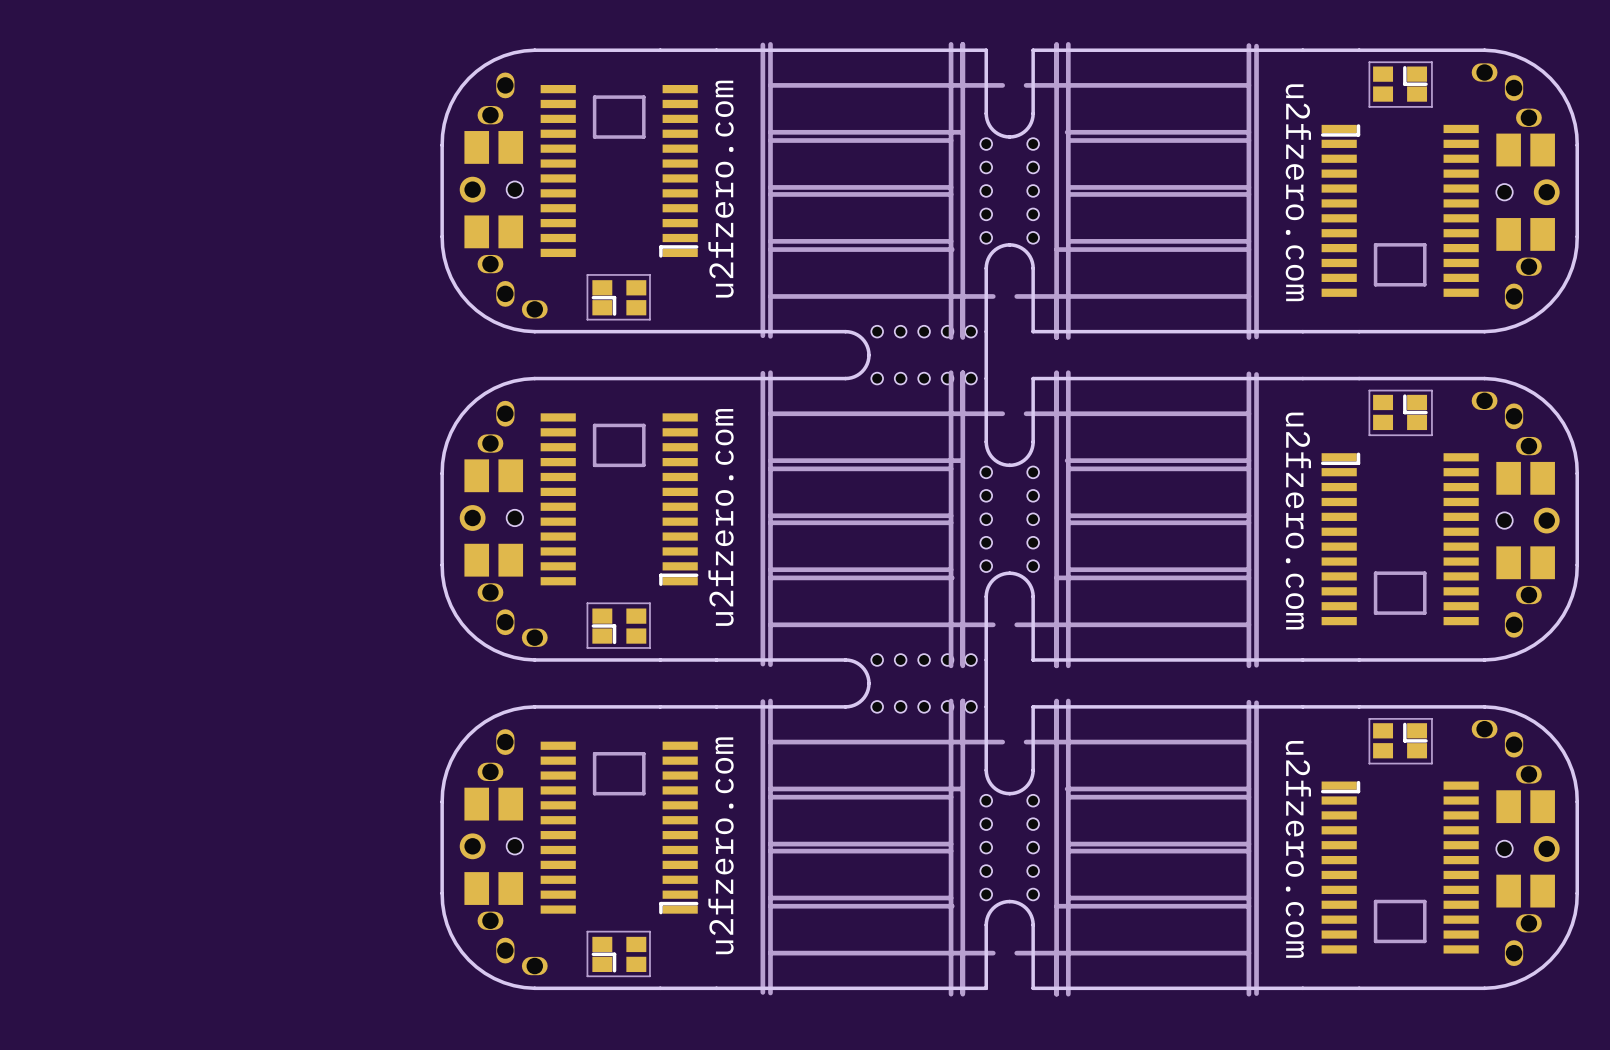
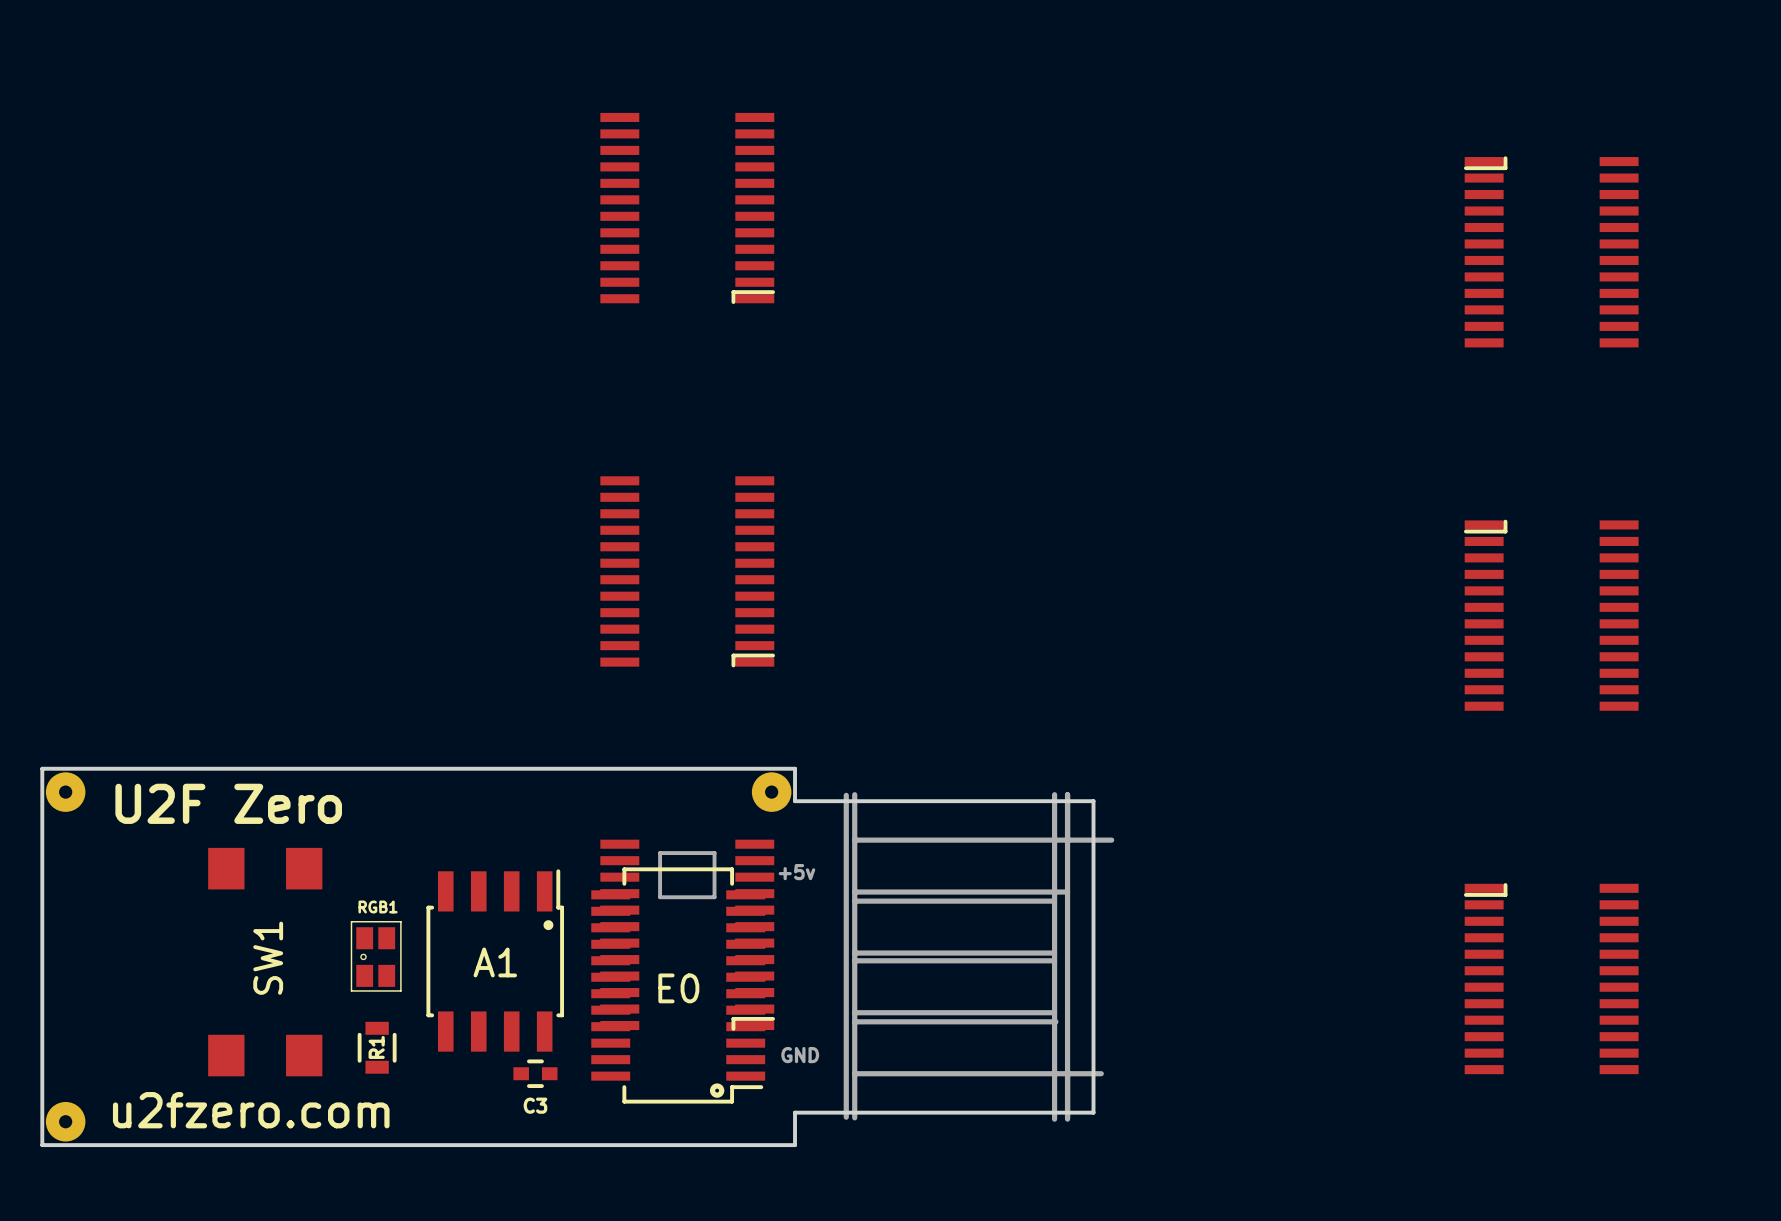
line: (762, 44) (762, 335) -> none
line: (770, 44) (770, 336) -> none
line: (951, 44) (951, 337) -> none
line: (962, 44) (962, 337) -> none
line: (1056, 44) (1056, 337) -> none
line: (1068, 44) (1068, 337) -> none
line: (1248, 45) (1248, 337) -> none
line: (1256, 46) (1256, 336) -> none
part: (1484, 72) -> none
part: (1400, 84) -> none
part: (505, 85) -> none
line: (770, 85) (1002, 85) -> none
line: (1026, 85) (1248, 85) -> none
part: (1514, 87) -> none
part: (490, 115) -> none
part: (619, 117) -> none
part: (1528, 117) -> none
line: (770, 132) (962, 132) -> none
line: (1067, 132) (1248, 132) -> none
line: (770, 140) (951, 140) -> none
line: (1068, 140) (1248, 140) -> none
line: (770, 187) (951, 187) -> none
line: (1068, 187) (1248, 187) -> none
part: (491, 189) -> none
text: u2fzero.com (721, 189) -> none
part: (986, 190) -> none
part: (1033, 190) -> none
text: u2fzero.com (1298, 192) -> none
part: (1527, 192) -> none
line: (770, 194) (951, 194) -> none
line: (1068, 194) (1248, 194) -> none
line: (770, 241) (951, 241) -> none
line: (1068, 241) (1248, 241) -> none
line: (770, 249) (952, 249) -> none
line: (1056, 249) (1248, 249) -> none
part: (490, 264) -> none
part: (1400, 264) -> none
part: (1528, 266) -> none
part: (505, 293) -> none
line: (770, 296) (993, 296) -> none
line: (1016, 296) (1248, 296) -> none
part: (1514, 296) -> none
part: (618, 297) -> none
part: (534, 309) -> none
part: (924, 331) -> none
line: (770, 372) (770, 664) -> none
line: (951, 372) (951, 665) -> none
line: (962, 372) (962, 665) -> none
line: (1056, 372) (1056, 665) -> none
line: (1068, 372) (1068, 665) -> none
line: (762, 373) (762, 664) -> none
line: (1248, 373) (1248, 665) -> none
line: (1256, 374) (1256, 665) -> none
part: (924, 378) -> none
part: (1484, 400) -> none
part: (1400, 412) -> none
part: (505, 413) -> none
line: (770, 413) (1002, 413) -> none
line: (1026, 413) (1248, 413) -> none
part: (1514, 416) -> none
part: (490, 443) -> none
part: (619, 445) -> none
part: (1528, 446) -> none
line: (770, 460) (962, 460) -> none
line: (1067, 460) (1248, 460) -> none
line: (770, 468) (951, 468) -> none
line: (1068, 468) (1248, 468) -> none
line: (770, 515) (951, 515) -> none
line: (1068, 515) (1248, 515) -> none
part: (491, 517) -> none
text: u2fzero.com (721, 517) -> none
part: (986, 519) -> none
part: (1033, 519) -> none
part: (1527, 520) -> none
text: u2fzero.com (1298, 521) -> none
line: (770, 522) (951, 522) -> none
line: (1068, 522) (1248, 522) -> none
line: (770, 569) (951, 569) -> none
line: (1068, 569) (1248, 569) -> none
line: (770, 577) (952, 577) -> none
line: (1056, 577) (1248, 577) -> none
part: (490, 592) -> none
part: (1400, 593) -> none
part: (1528, 595) -> none
part: (505, 622) -> none
line: (770, 624) (993, 624) -> none
line: (1016, 624) (1248, 624) -> none
part: (1514, 624) -> none
part: (618, 625) -> none
part: (534, 637) -> none
part: (924, 659) -> none
part: none -> (65, 792)
part: none -> (771, 792)
line: (1056, 701) (1056, 994) -> none
line: (1068, 701) (1068, 994) -> none
line: (1248, 702) (1248, 994) -> none
line: (1256, 702) (1256, 993) -> none
board edge: (716, 706) (534, 706) (503, 712) (476, 728) (455, 751) (444, 780) (442, 801) (442, 893) (444, 914) (455, 943) (468, 960) (485, 973) (513, 985) (534, 988) (716, 988) -> (795, 801) (795, 768) (42, 768) (42, 1145) (795, 1145) (795, 1112)
board edge: (845, 706) (859, 702) (865, 695) (868, 686) (868, 677) (864, 669) (851, 660) (524, 659) (503, 654) (485, 644) (468, 631) (455, 615) (447, 596) (442, 575) (442, 463) (447, 442) (455, 423) (468, 406) (485, 393) (513, 381) (534, 378) (848, 378) (862, 371) (867, 364) (868, 355) (867, 346) (862, 338) (848, 331) (534, 331) (513, 329) (485, 316) (468, 303) (455, 286) (447, 267) (442, 236) (442, 145) (444, 124) (455, 95) (476, 71) (503, 55) (534, 50) (986, 50) (987, 119) (995, 132) (1009, 136) (1023, 132) (1032, 119) (1033, 50) (1484, 50) (1515, 55) (1542, 71) (1563, 95) (1575, 124) (1577, 145) (1577, 236) (1575, 257) (1563, 286) (1550, 303) (1534, 316) (1515, 326) (1484, 331) (1033, 331) (1033, 268) (1031, 259) (1021, 248) (1012, 245) (1003, 245) (993, 251) (986, 265) (986, 441) (991, 456) (1003, 464) (1015, 464) (1028, 456) (1033, 441) (1033, 378) (1484, 378) (1515, 384) (1534, 393) (1557, 414) (1568, 432) (1576, 463) (1576, 575) (1568, 605) (1550, 631) (1534, 644) (1515, 654) (1484, 659) (1033, 659) (1032, 590) (1023, 578) (1015, 574) (1006, 573) (993, 580) (986, 593) (986, 706) -> (937, 801) (1093, 801)
part: (924, 706) -> none
text: none -> U2F Zero (228, 803)
part: (1484, 729) -> none
part: (1400, 741) -> none
part: (505, 742) -> none
line: (1026, 742) (1248, 742) -> none
part: (1514, 744) -> none
board edge: (986, 770) (991, 784) (1003, 792) (1015, 792) (1028, 784) (1033, 770) (1033, 706) (1484, 706) (1515, 712) (1534, 721) (1550, 735) (1568, 761) (1575, 780) (1577, 801) (1577, 893) (1572, 924) (1563, 943) (1550, 960) (1534, 973) (1505, 985) (1484, 988) (1033, 988) (1033, 924) (1028, 910) (1015, 902) (1003, 902) (991, 910) (986, 924) -> (1093, 871) (1093, 1042)
part: (490, 771) -> none
text: none -> +5v (796, 872)
part: (1528, 774) -> none
line: (1067, 788) (1248, 788) -> none
line: (1068, 797) (1248, 797) -> none
drawing: none -> [543, 920, 554, 931]
drawing: none -> [360, 953, 367, 961]
line: (1068, 844) (1248, 844) -> none
text: u2fzero.com (721, 845) -> none
part: (491, 846) -> none
RGB1: none -> (376, 956)
part: (986, 847) -> none
part: (1033, 847) -> none
part: (1527, 848) -> none
text: u2fzero.com (1298, 849) -> none
A1: none -> (495, 960)
line: (1068, 851) (1248, 851) -> none
SW1: none -> (265, 962)
E0: none -> (678, 985)
line: (1068, 898) (1248, 898) -> none
line: (1056, 906) (1248, 906) -> none
part: (490, 920) -> none
part: (1400, 921) -> none
part: (1528, 923) -> none
R1: none -> (377, 1047)
text: none -> GND (800, 1055)
part: (505, 950) -> none
C3: none -> (535, 1073)
part: (618, 953) -> none
line: (1016, 953) (1248, 953) -> none
part: (1514, 953) -> none
drawing: none -> [709, 1083, 725, 1098]
part: (534, 966) -> none
text: none -> u2fzero.com (251, 1110)
part: none -> (65, 1121)

